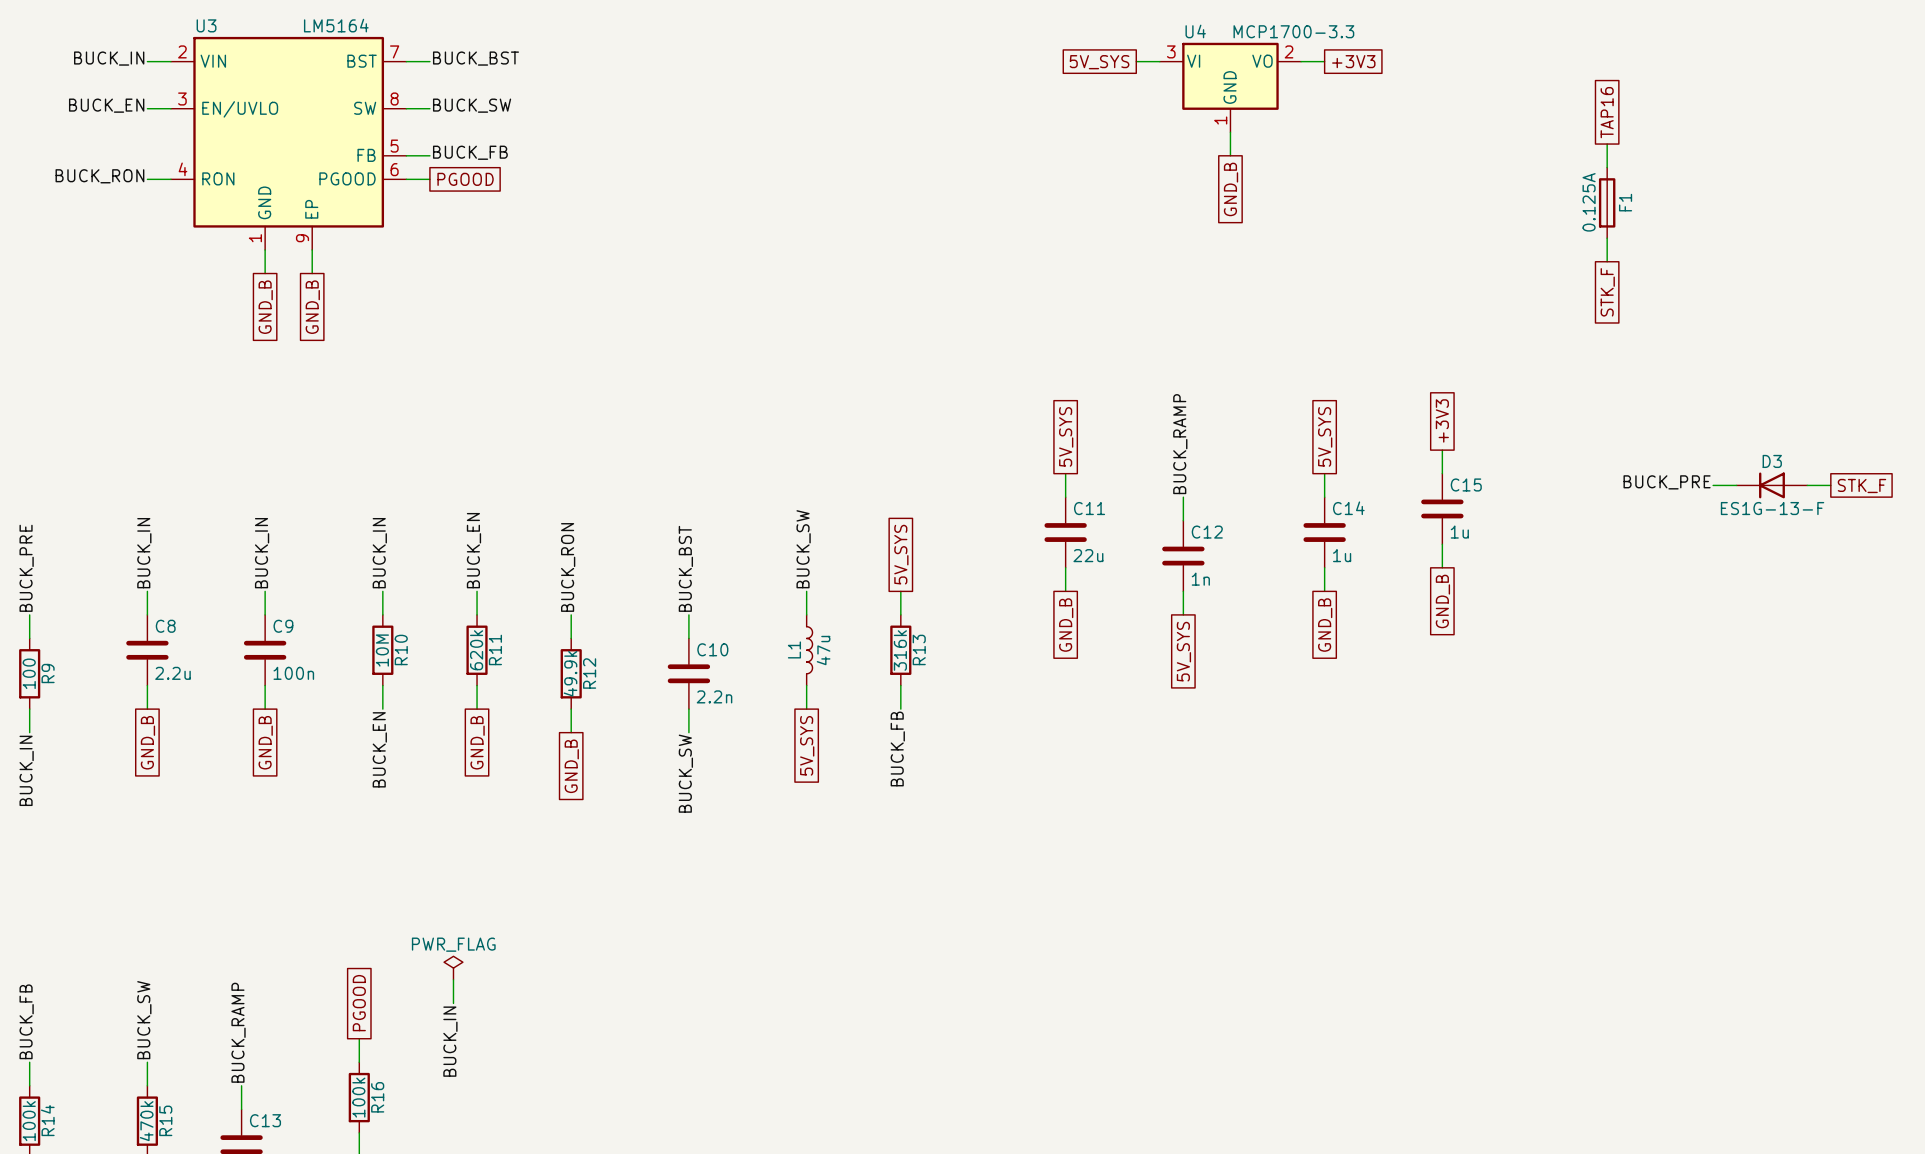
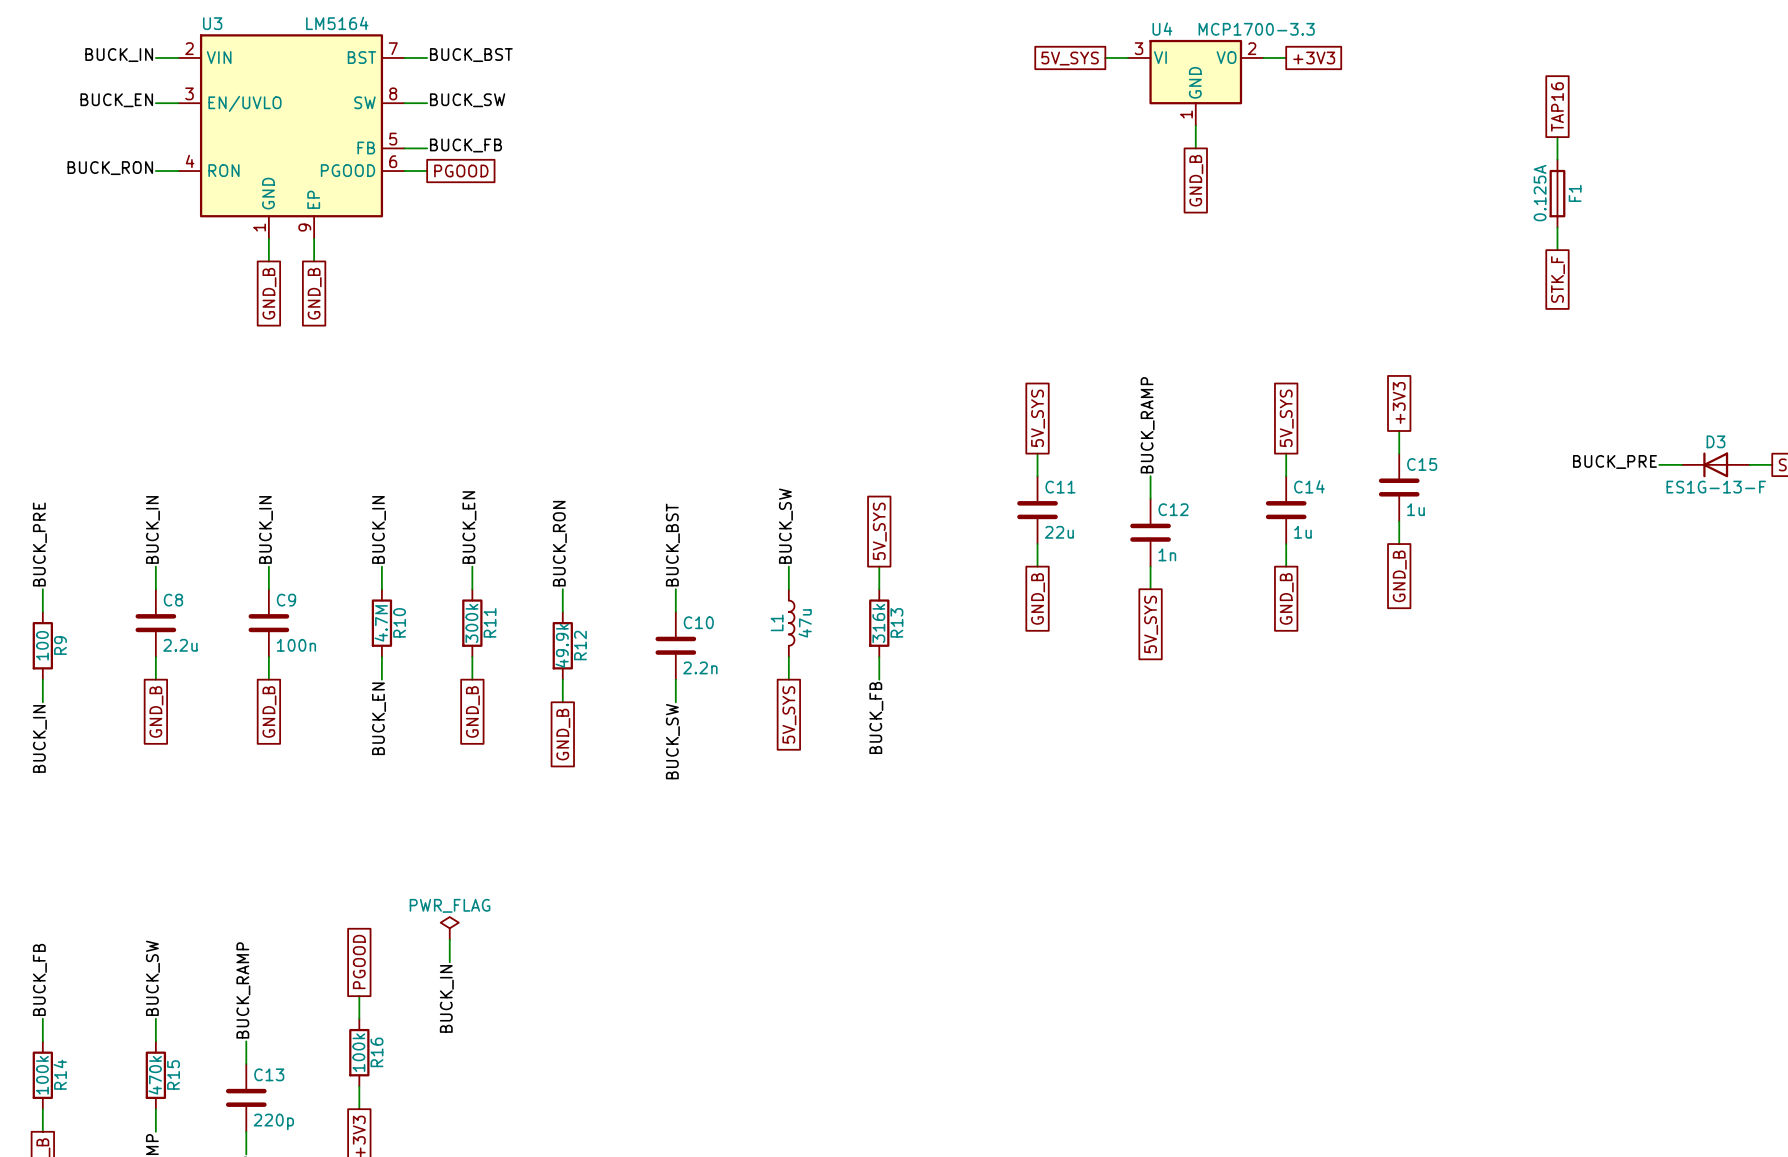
R10 value: 10M (382, 650) -> 4.7M (381, 623)
R11 value: 620k (476, 650) -> 300k (471, 623)

